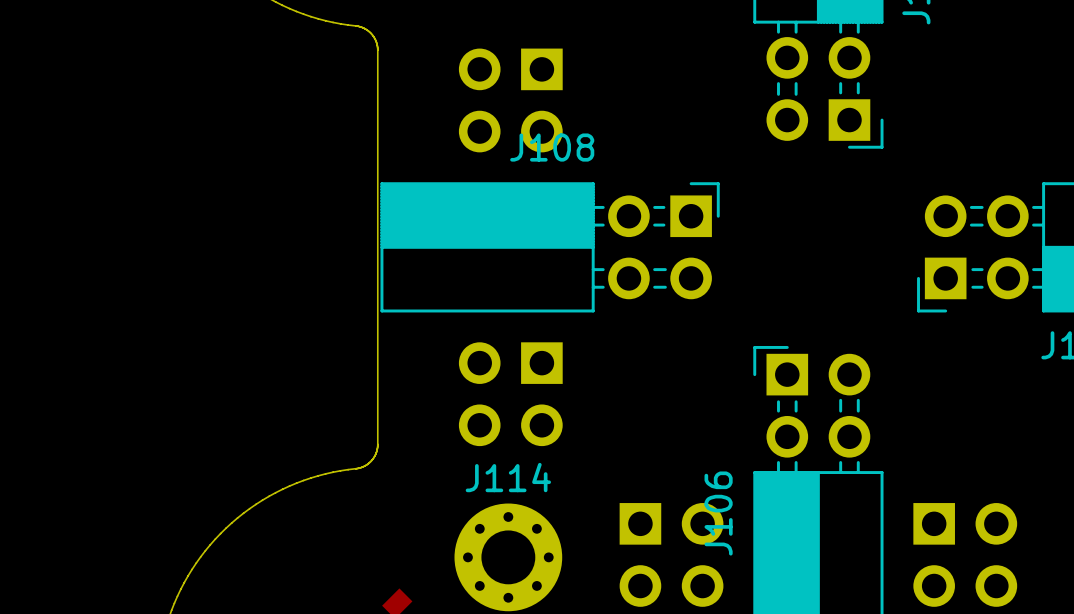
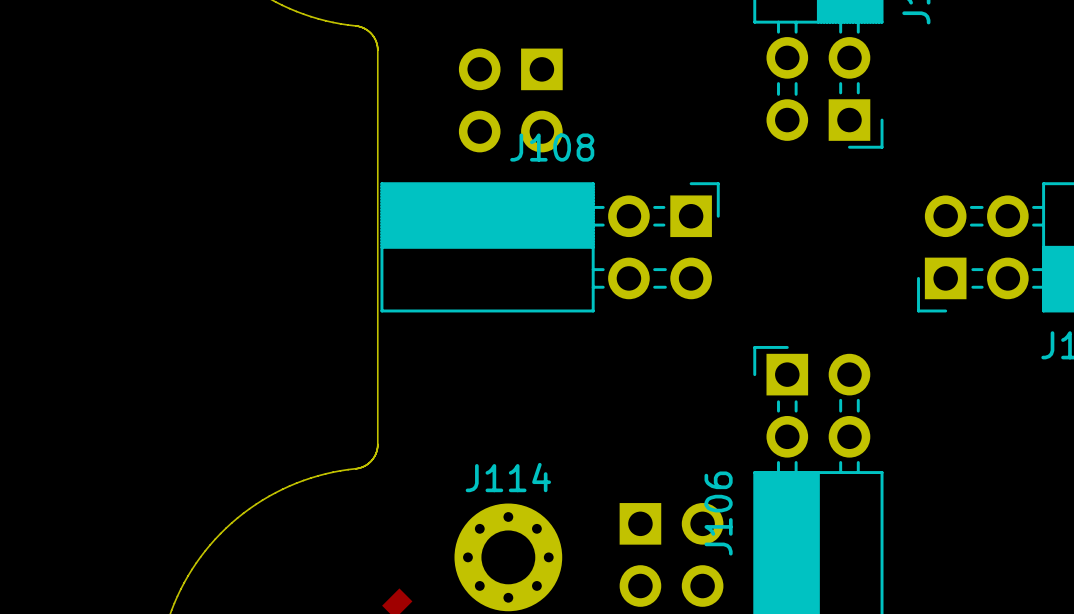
part: (510, 394) -> none
part: (965, 554) -> none

